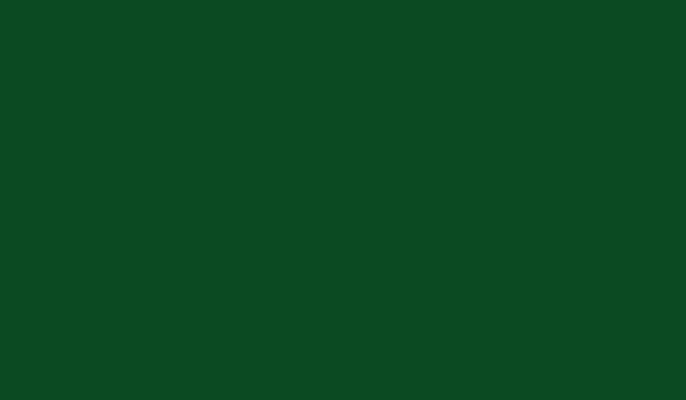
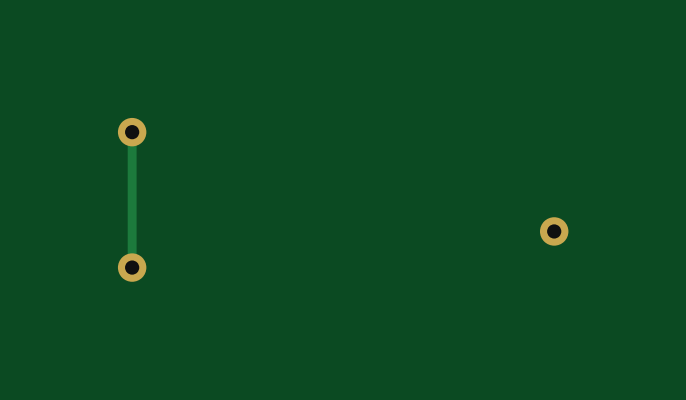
track: none -> (132, 132) (132, 267)
via: none -> (132, 132)
via: none -> (554, 231)
via: none -> (132, 267)

